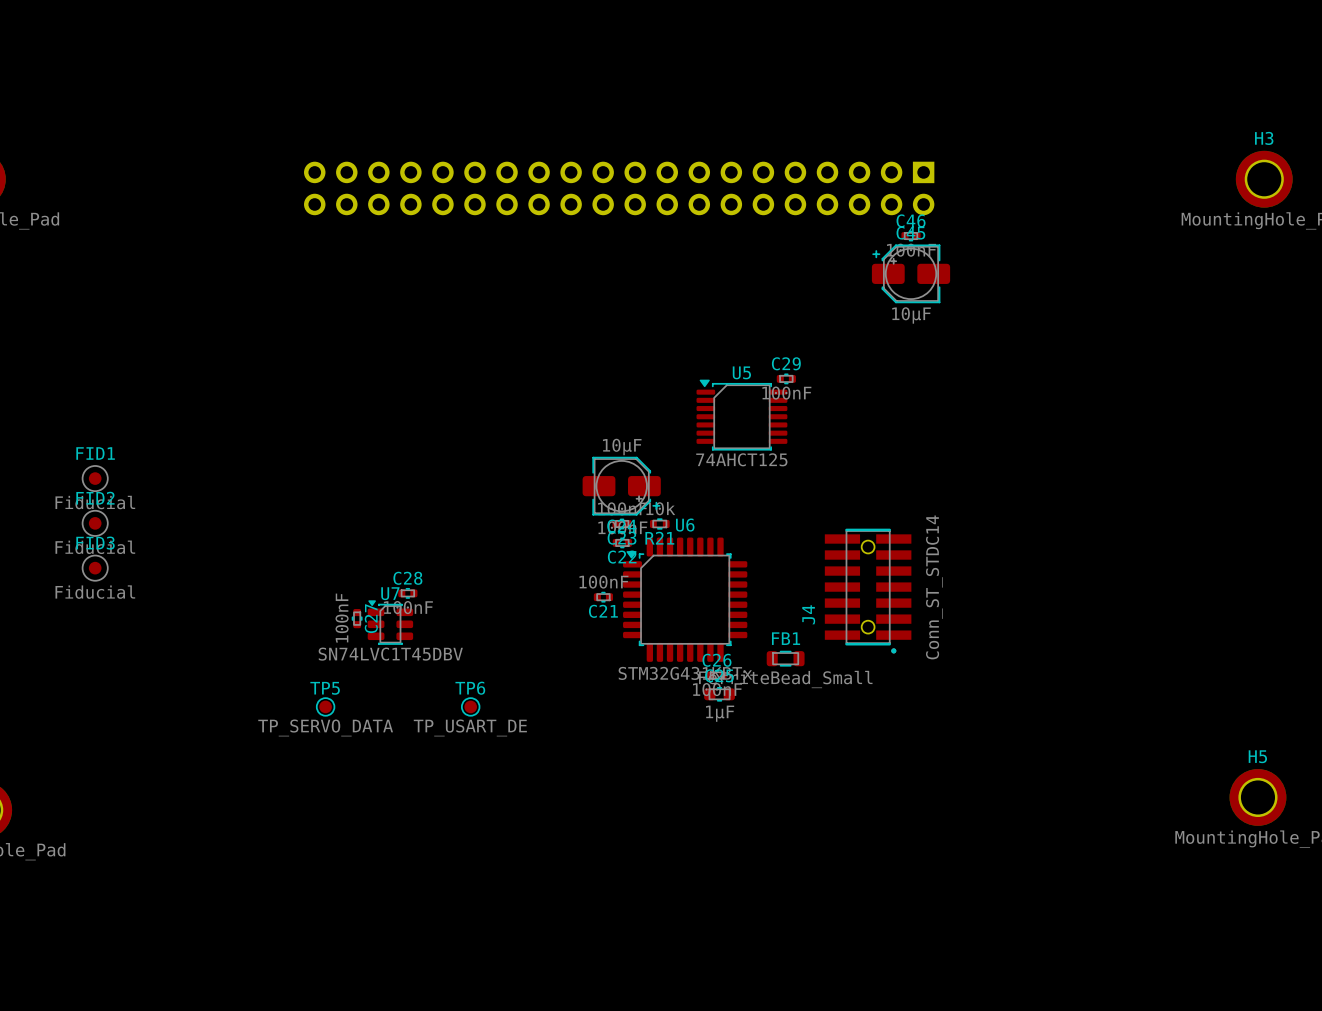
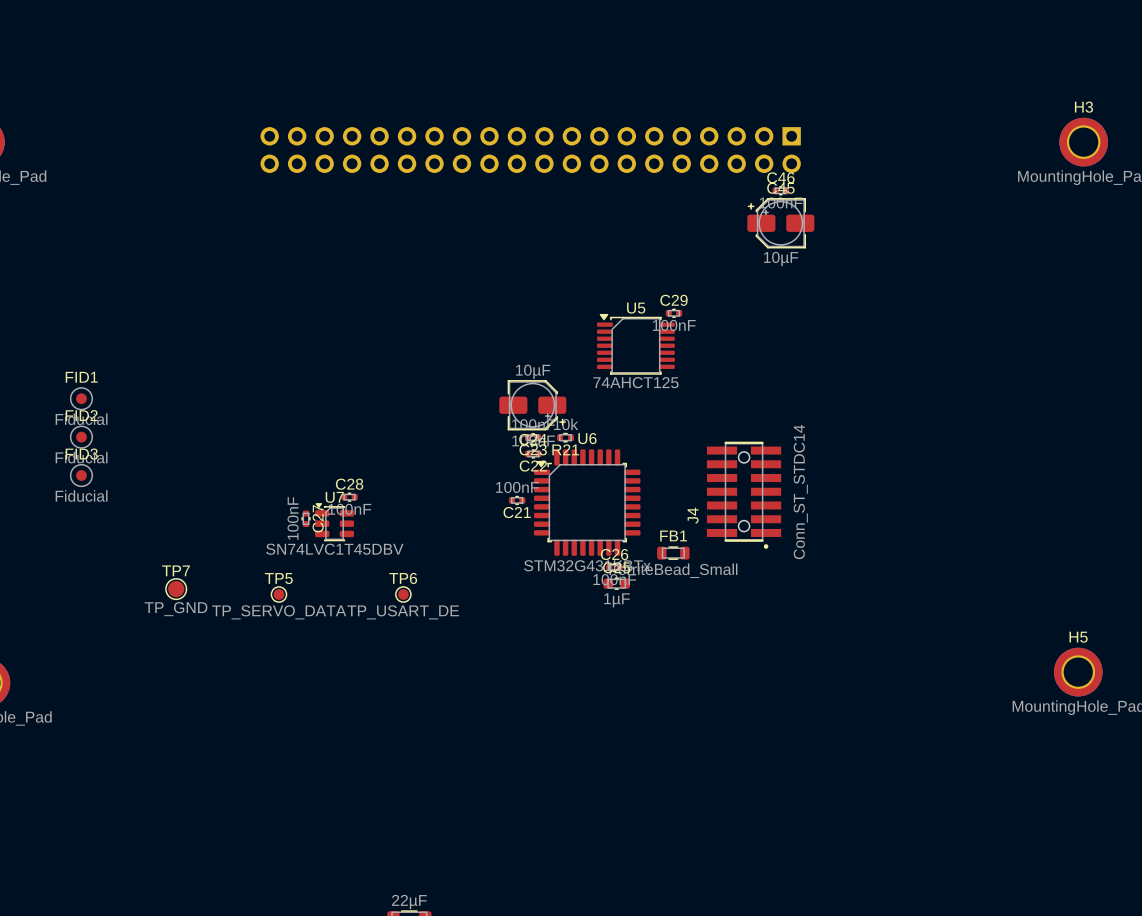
TP7: none -> TP_GND (176, 589)

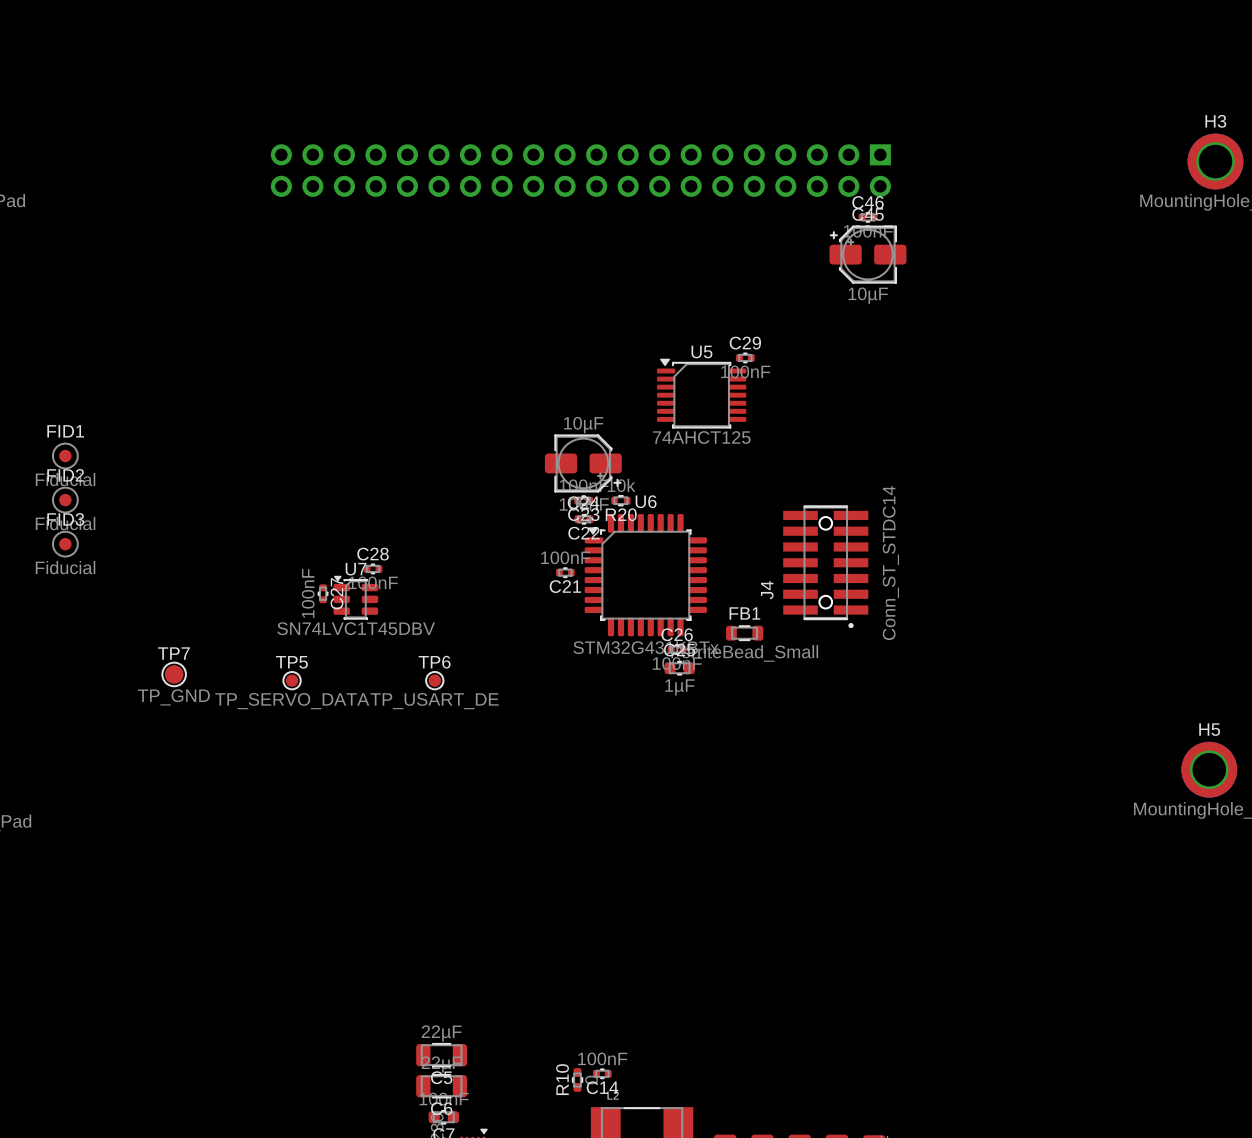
R21 name: R21 (565, 449) -> R20 (621, 514)

